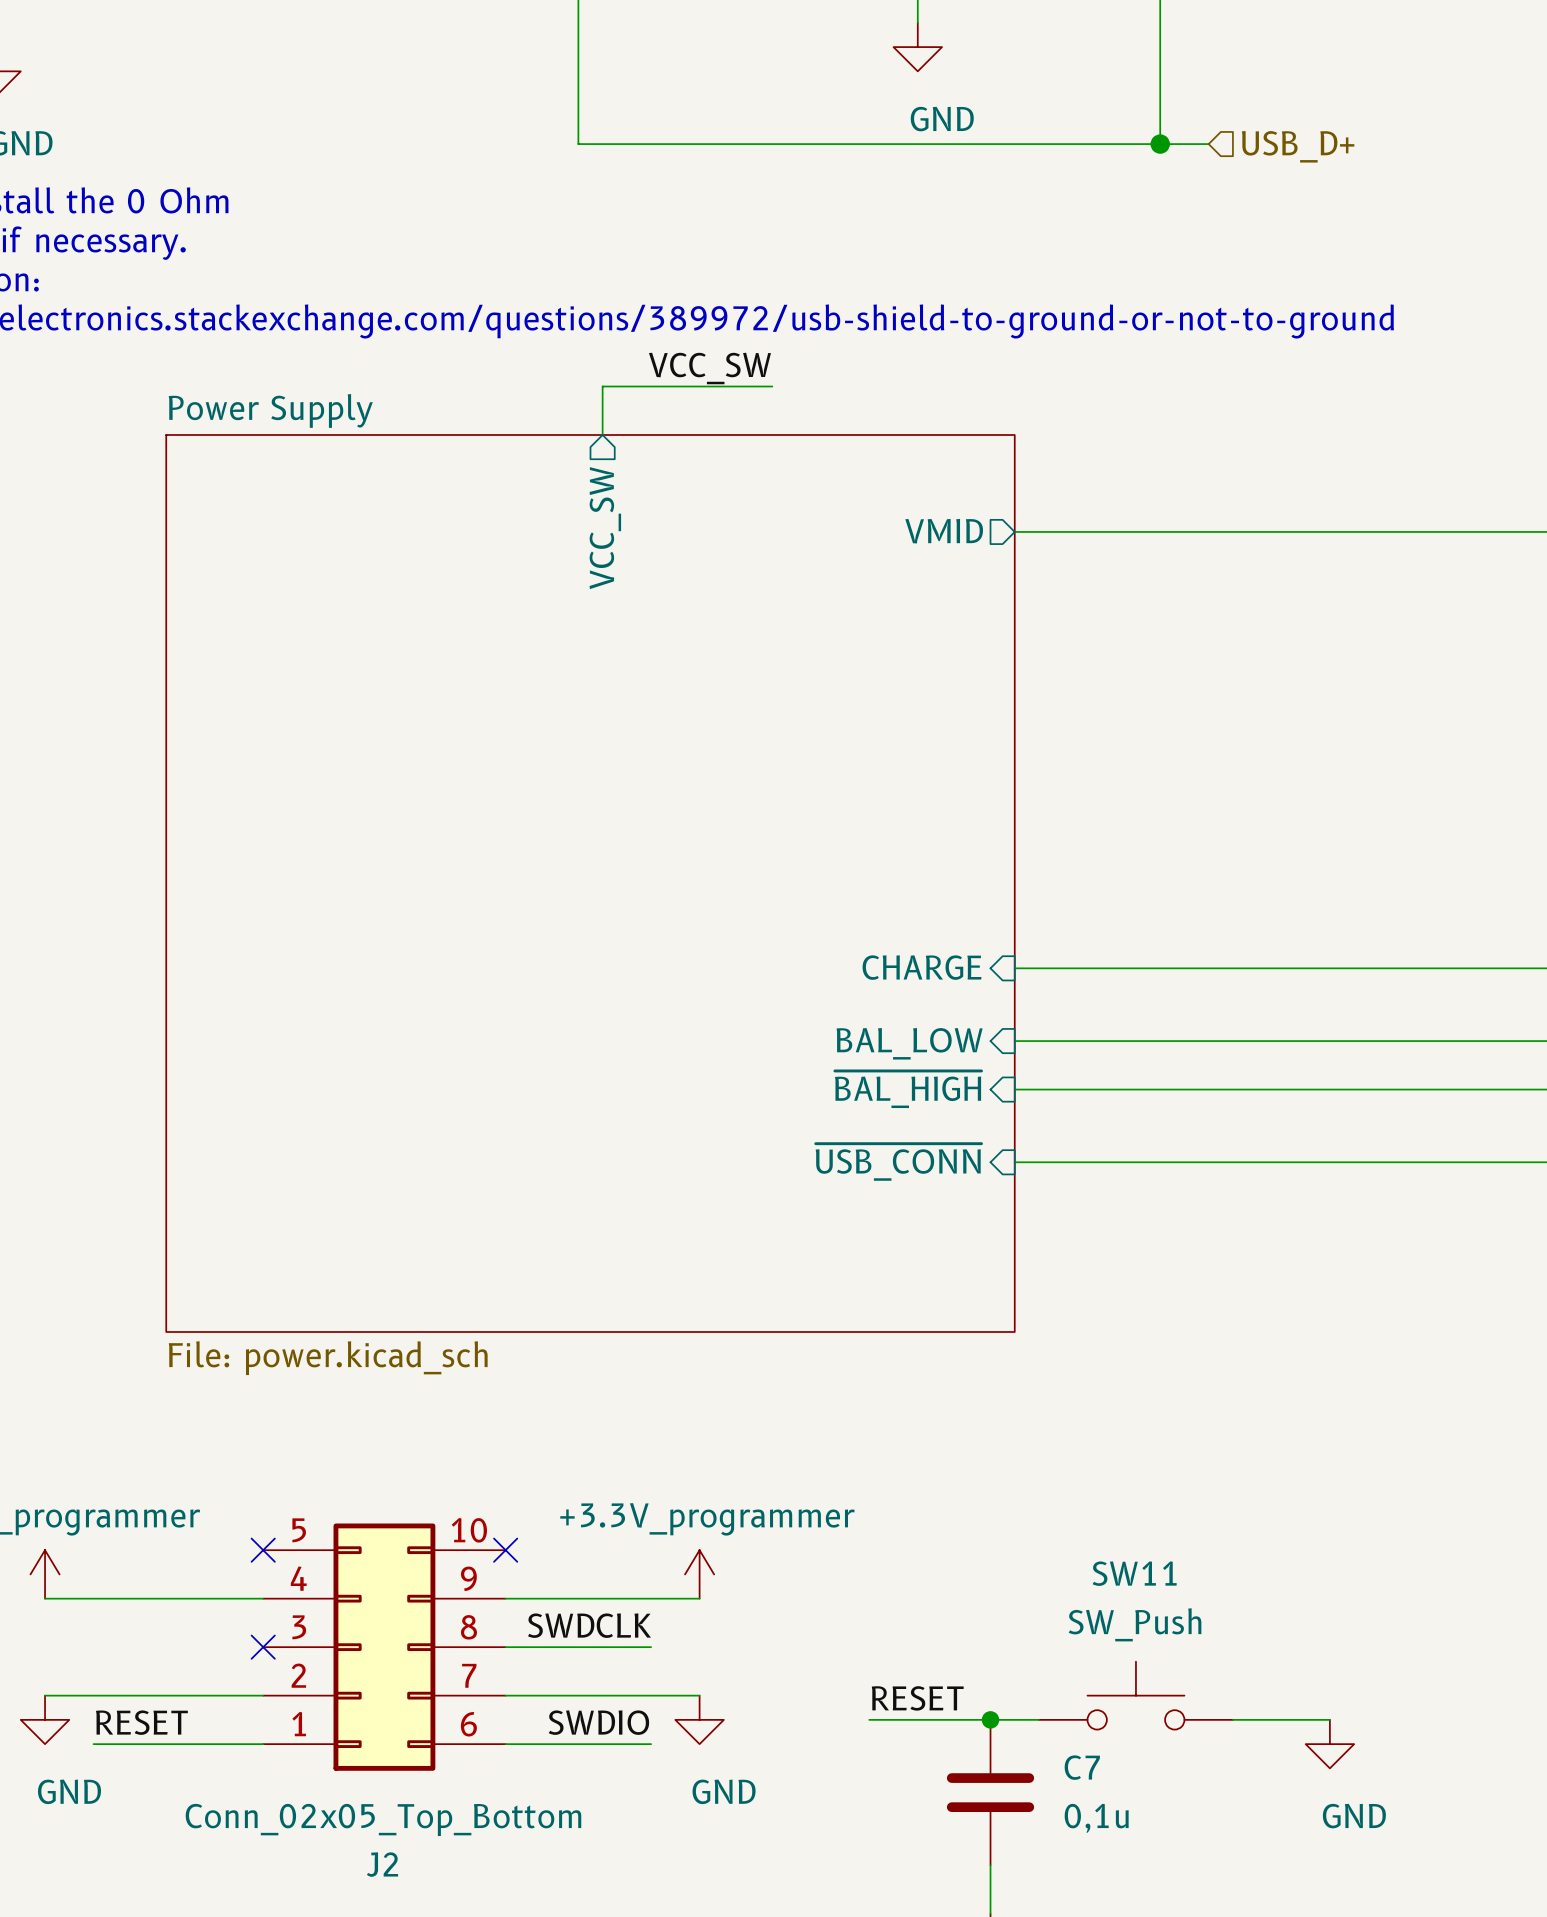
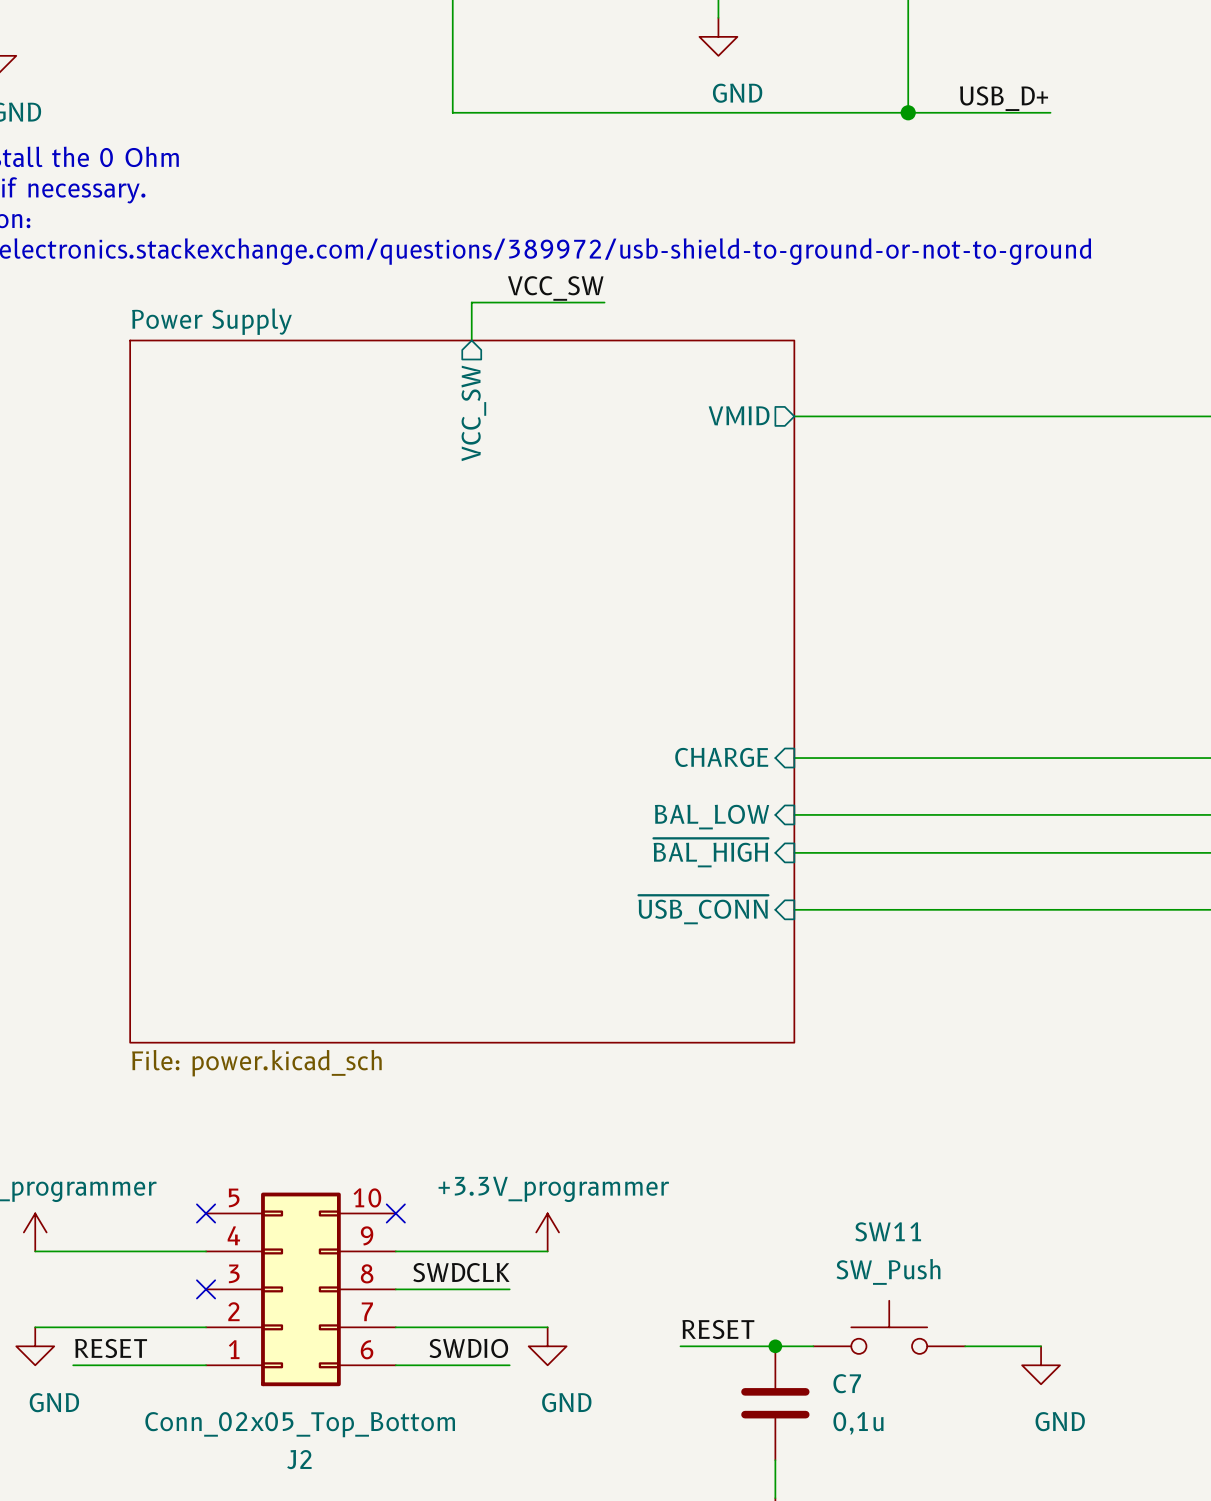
label: none -> USB_D+ (1004, 98)
wire: none -> (946, 112) (1050, 112)
hierarchical label: USB_D+ (1298, 146) -> none

